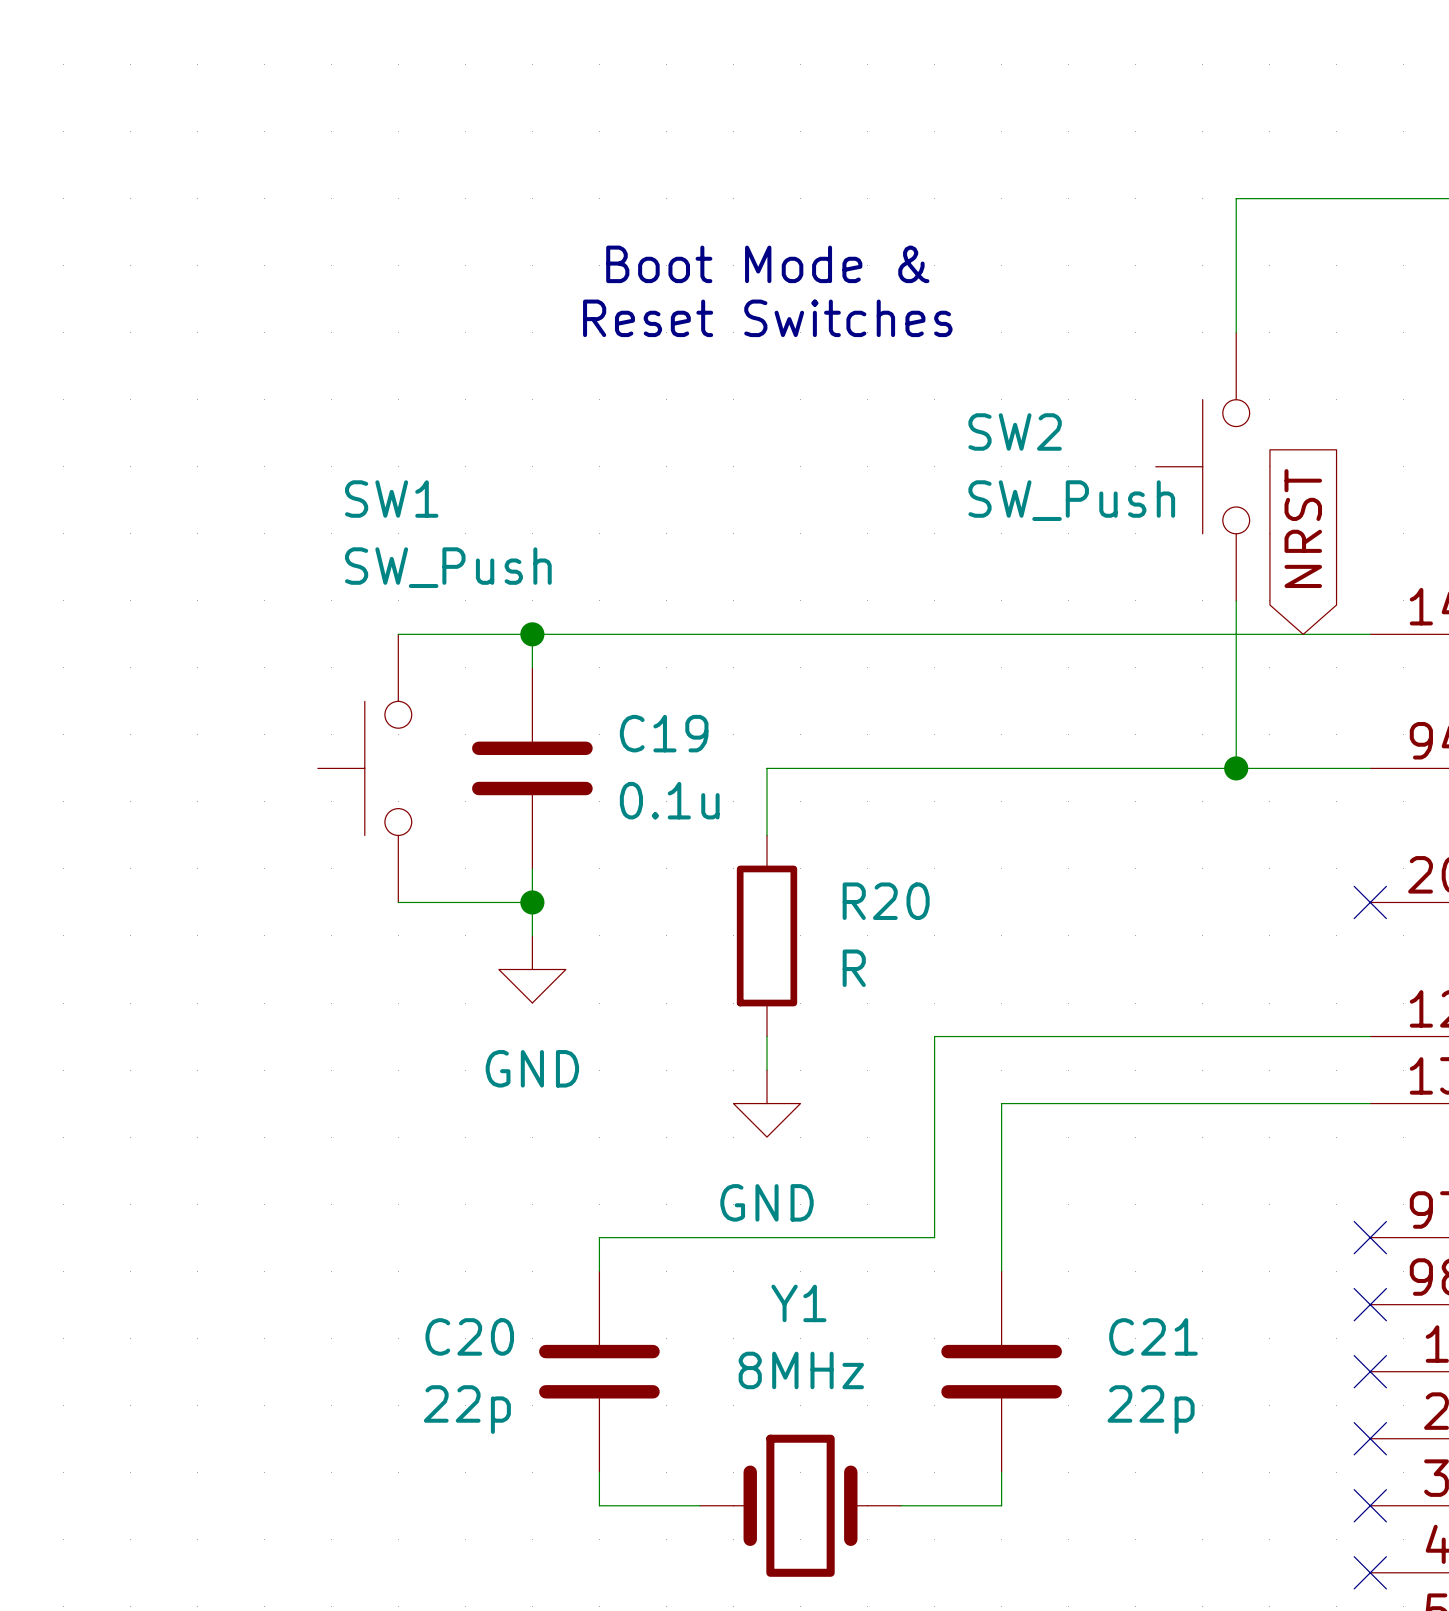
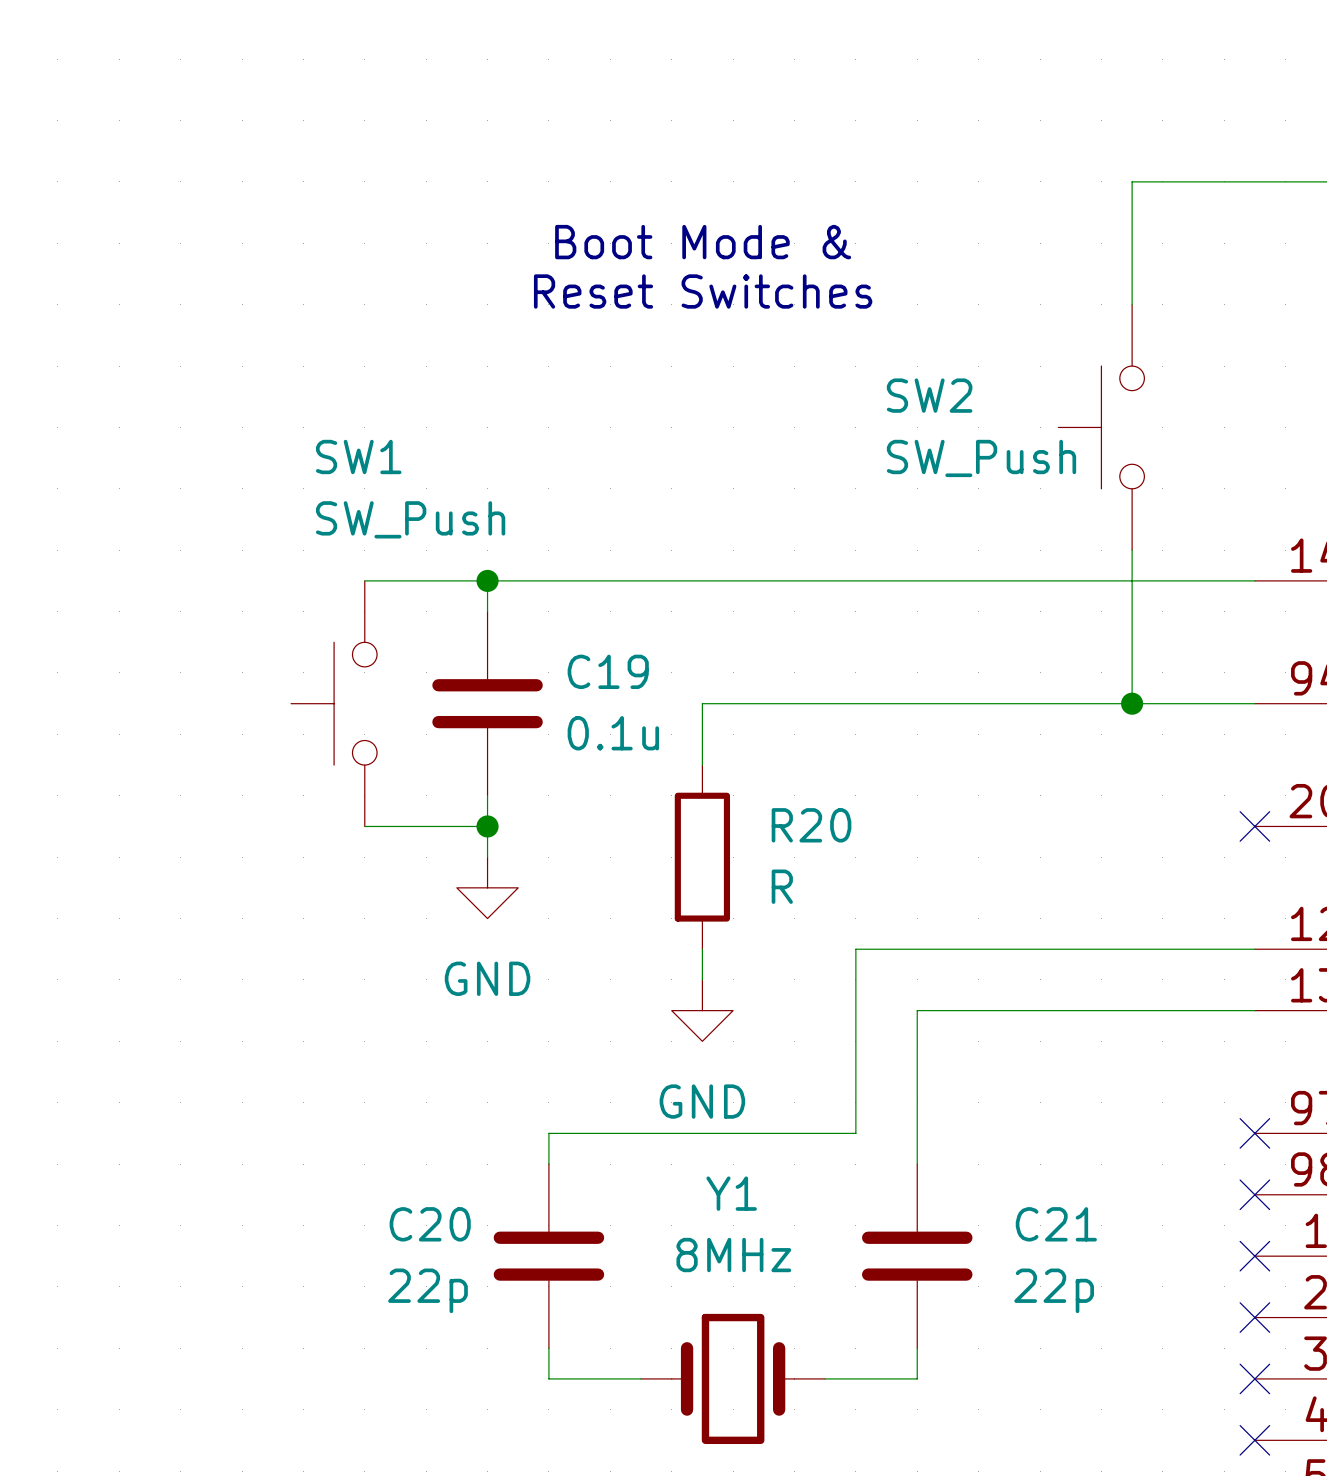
global label: NRST (1303, 528) -> none

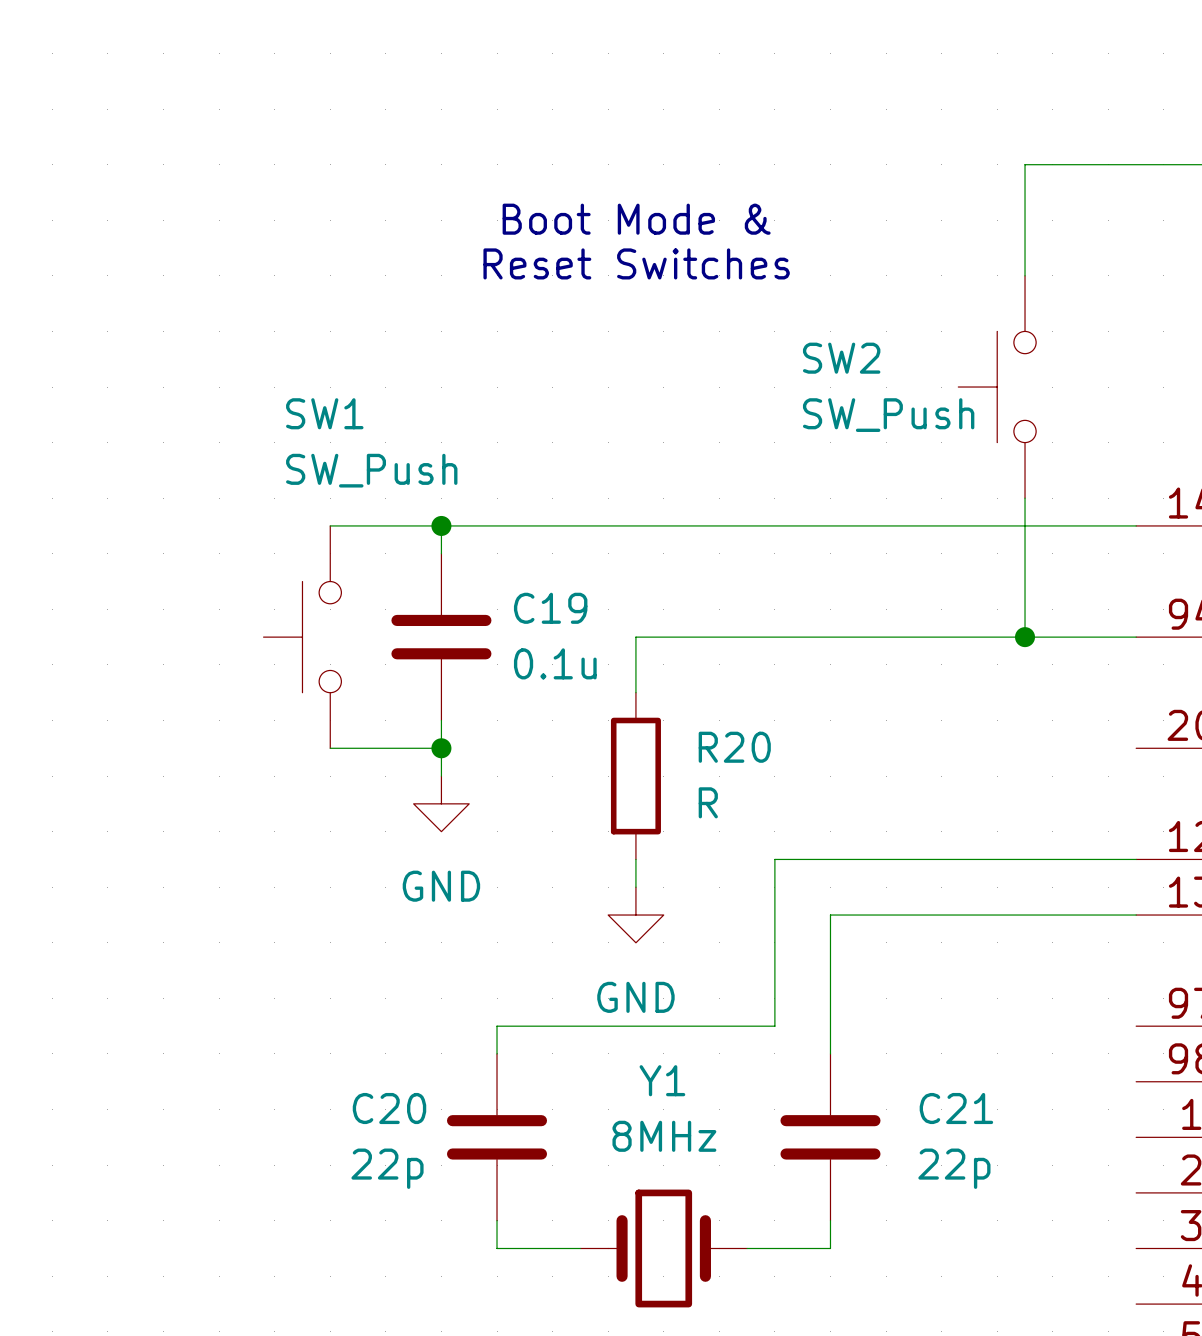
no-connect mark: (1254, 826) -> none
no-connect mark: (1254, 1133) -> none
no-connect mark: (1254, 1194) -> none
no-connect mark: (1254, 1256) -> none
no-connect mark: (1254, 1317) -> none
no-connect mark: (1254, 1378) -> none
no-connect mark: (1254, 1440) -> none

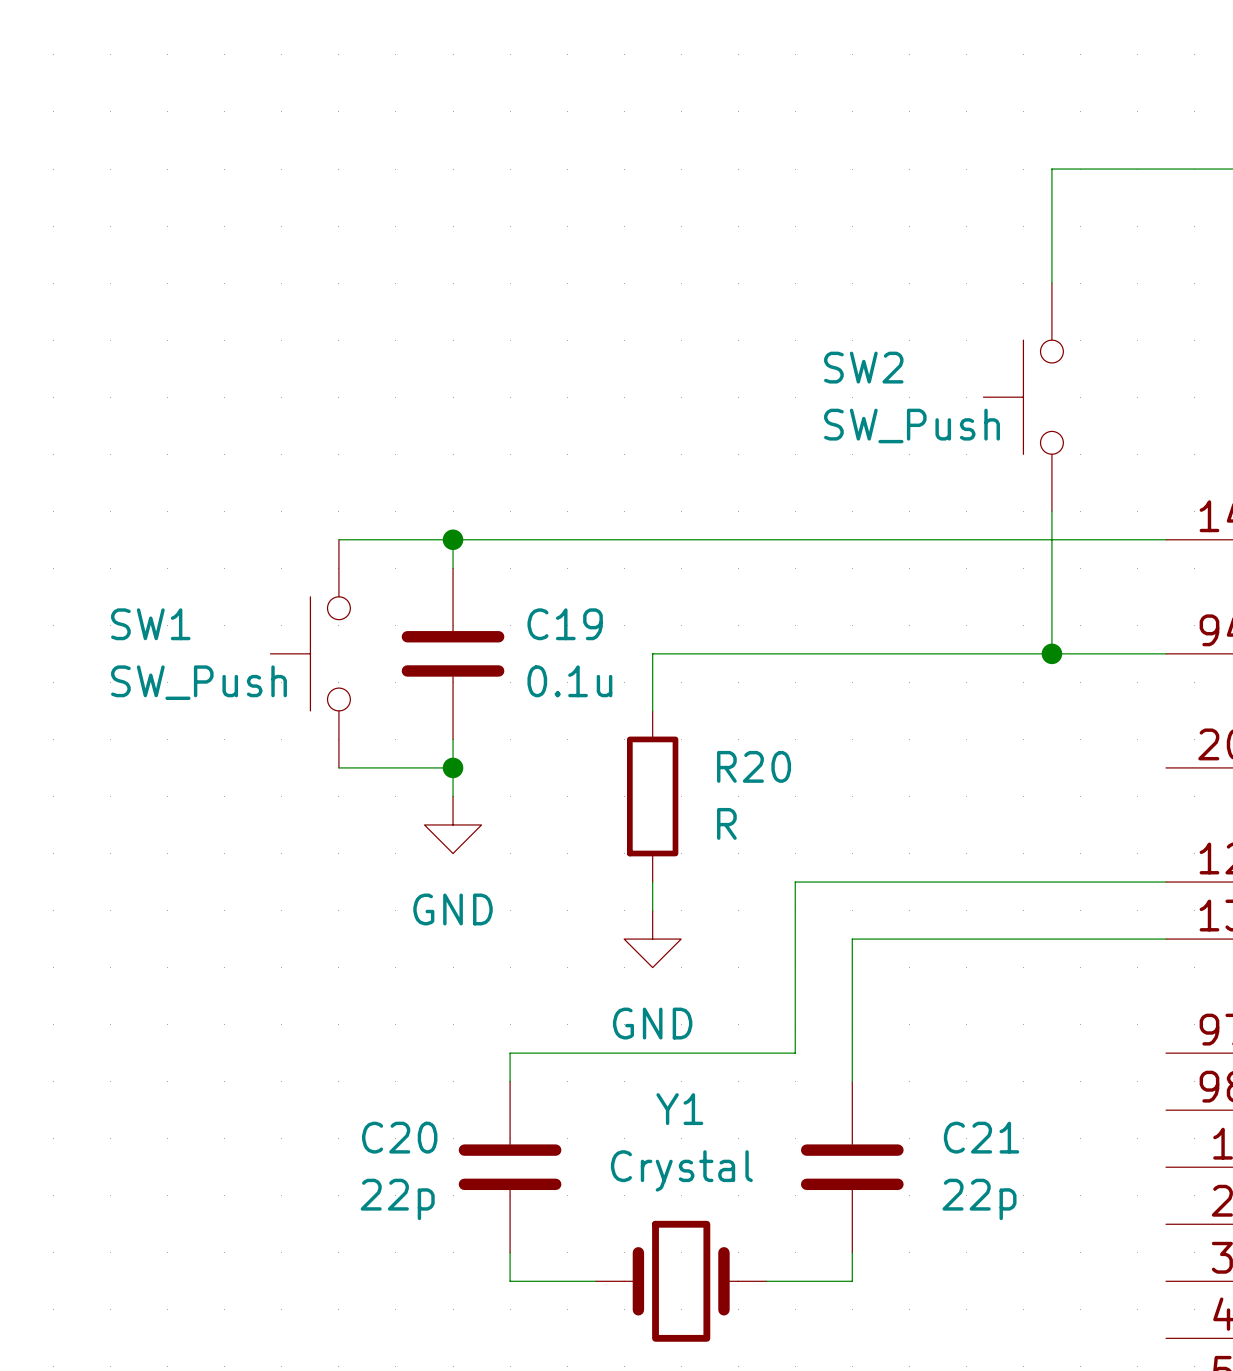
text: Boot Mode & (636, 219) -> none
text: Reset Switches (636, 263) -> none
SW1 name position: SW1 (324, 413) -> SW1 (150, 624)
SW1 value position: SW_Push (371, 470) -> SW_Push (199, 682)
Y1 value: 8MHz (664, 1136) -> Crystal (681, 1170)

